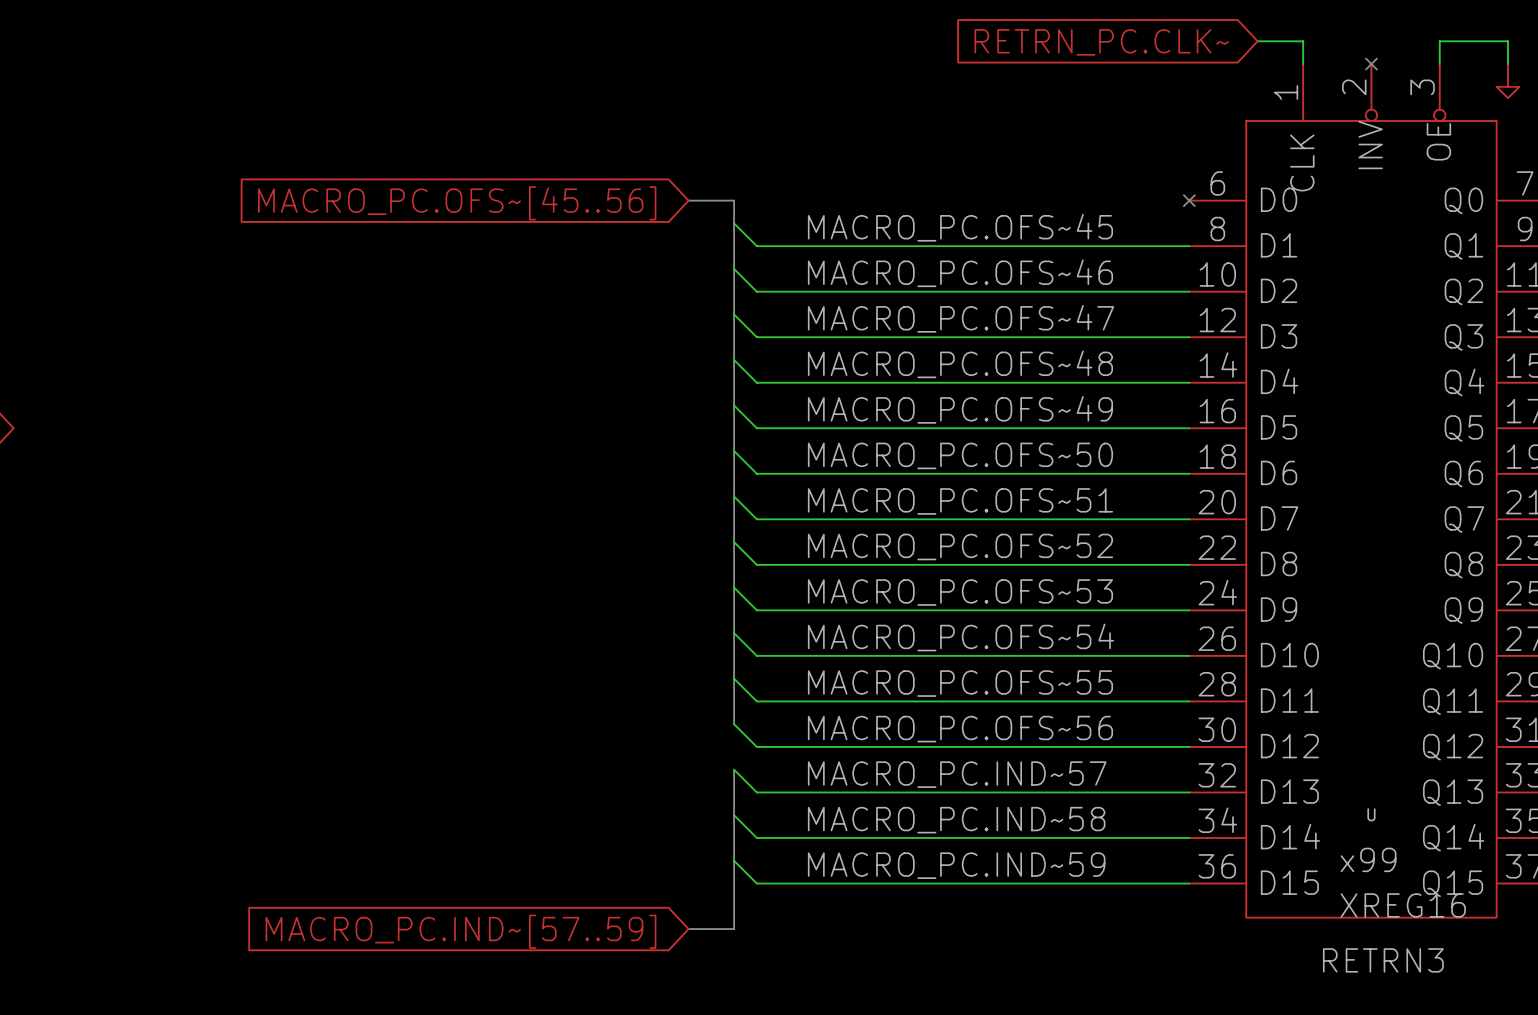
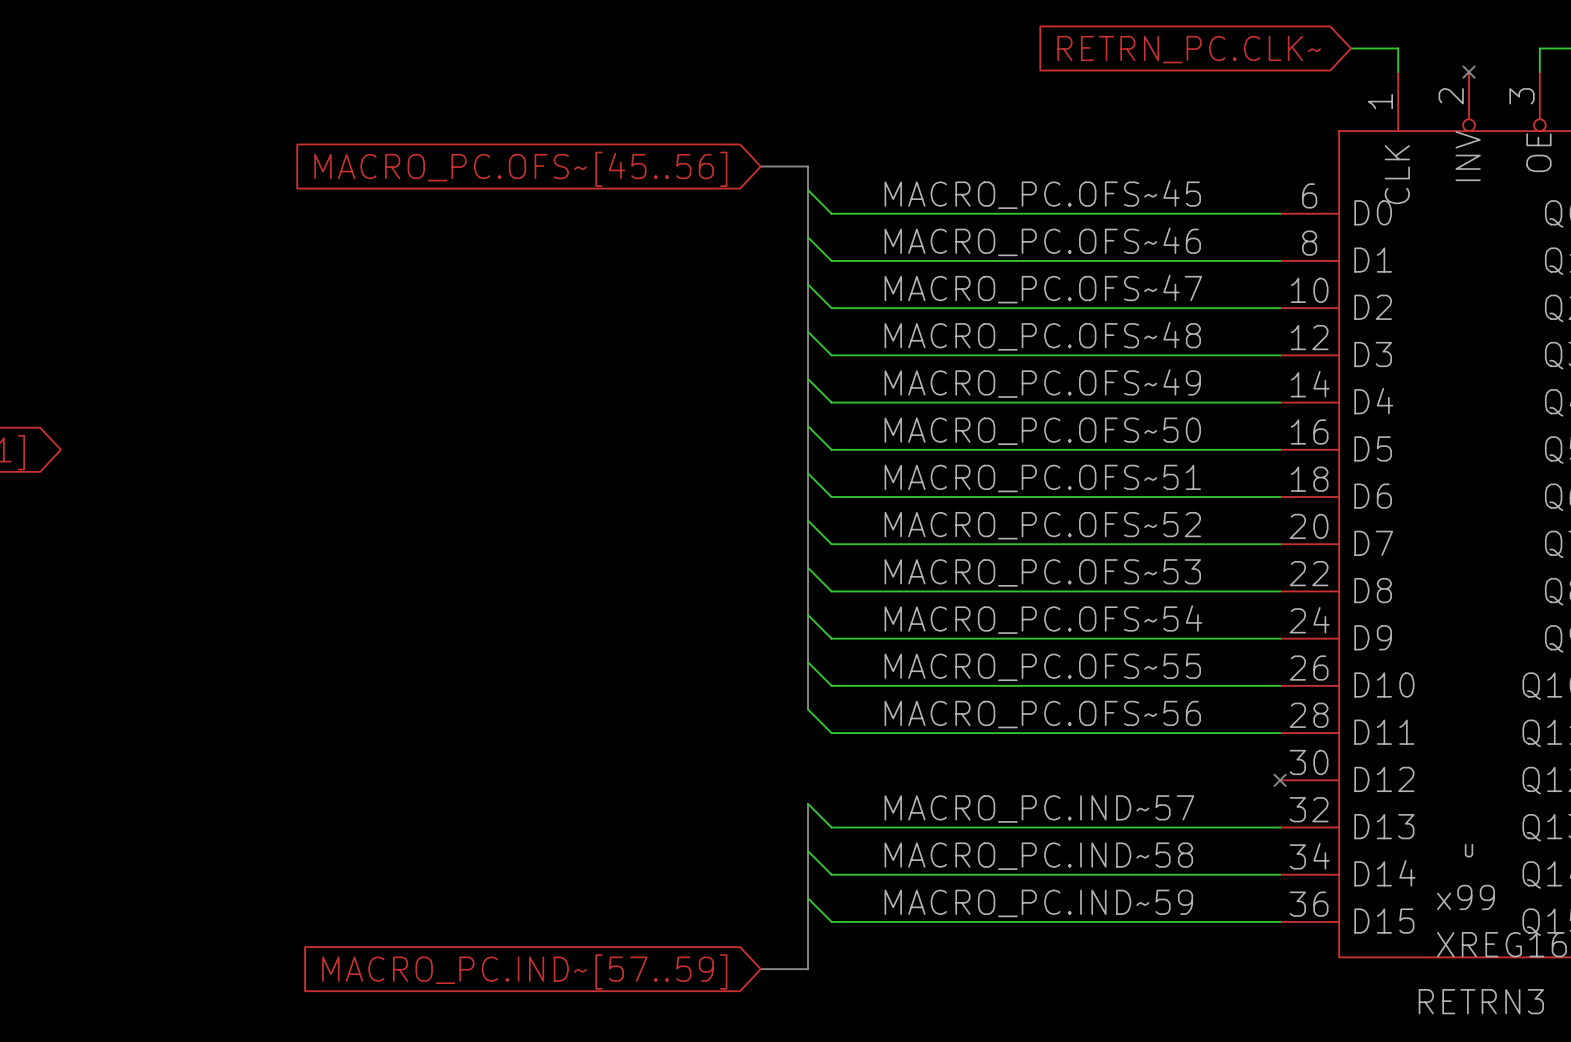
wire: none -> (808, 190) (831, 213) (1280, 213)
label: none -> MACRO_PC.OFS~45 (1042, 194)
bus: (688, 200) (734, 200) -> (760, 166) (808, 166) (808, 213)
no-connect mark: (1189, 200) -> none
global label position: MACRO_PC.OFS~[45..56] (457, 203) -> MACRO_PC.OFS~[45..56] (520, 169)
label: MACRO_PC.OFS~45 (960, 227) -> MACRO_PC.OFS~46 (1042, 241)
label: MACRO_PC.OFS~46 (960, 273) -> MACRO_PC.OFS~47 (1043, 289)
label: MACRO_PC.OFS~47 (961, 318) -> MACRO_PC.OFS~48 (1042, 336)
label: MACRO_PC.OFS~48 (960, 364) -> MACRO_PC.OFS~49 (1042, 383)
label: MACRO_PC.OFS~49 (960, 409) -> MACRO_PC.OFS~50 (1042, 431)
label: MACRO_PC.OFS~50 (960, 455) -> MACRO_PC.OFS~51 (1042, 478)
label: MACRO_PC.OFS~51 (960, 501) -> MACRO_PC.OFS~52 (1042, 525)
label: MACRO_PC.OFS~52 (960, 546) -> MACRO_PC.OFS~53 (1042, 572)
label: MACRO_PC.OFS~53 (960, 592) -> MACRO_PC.OFS~54 (1043, 619)
label: MACRO_PC.OFS~54 (961, 637) -> MACRO_PC.OFS~55 (1042, 667)
bus: (734, 678) (734, 724) -> none
label: MACRO_PC.OFS~55 (960, 683) -> MACRO_PC.OFS~56 (1042, 714)
wire: (734, 724) (756, 746) (1189, 746) -> none
label: MACRO_PC.OFS~56 (960, 729) -> none
no-connect mark: none -> (1280, 780)

